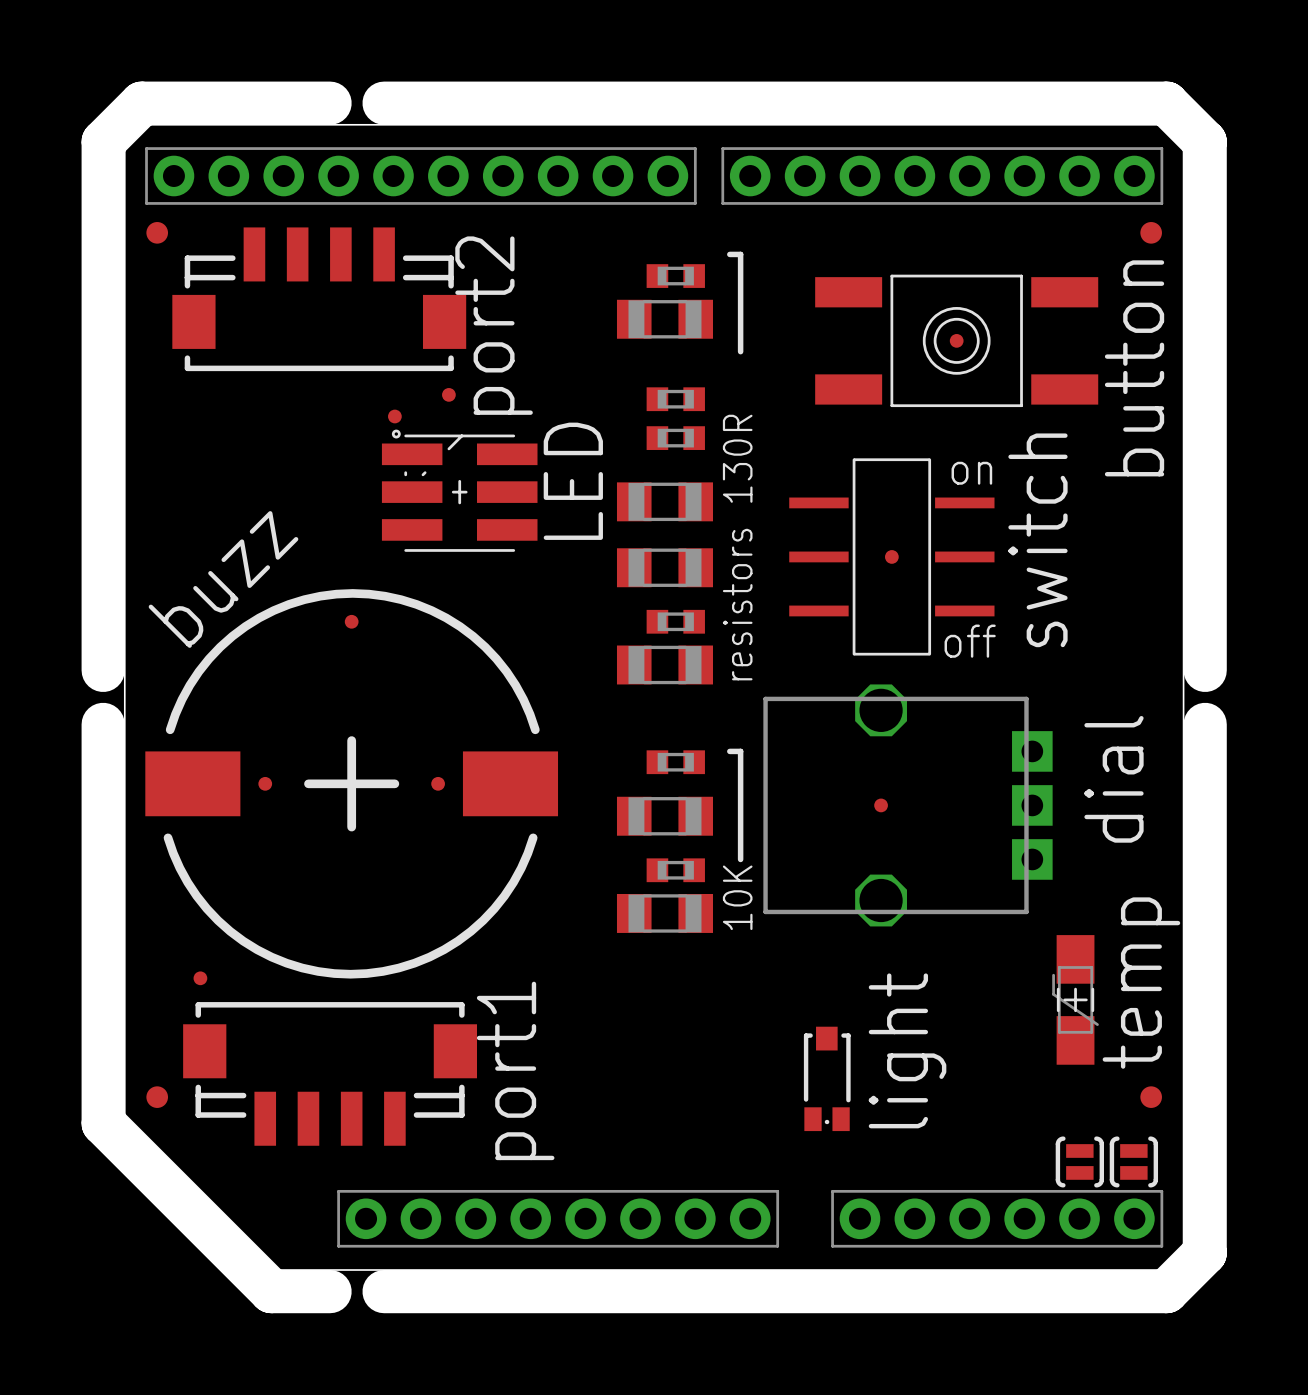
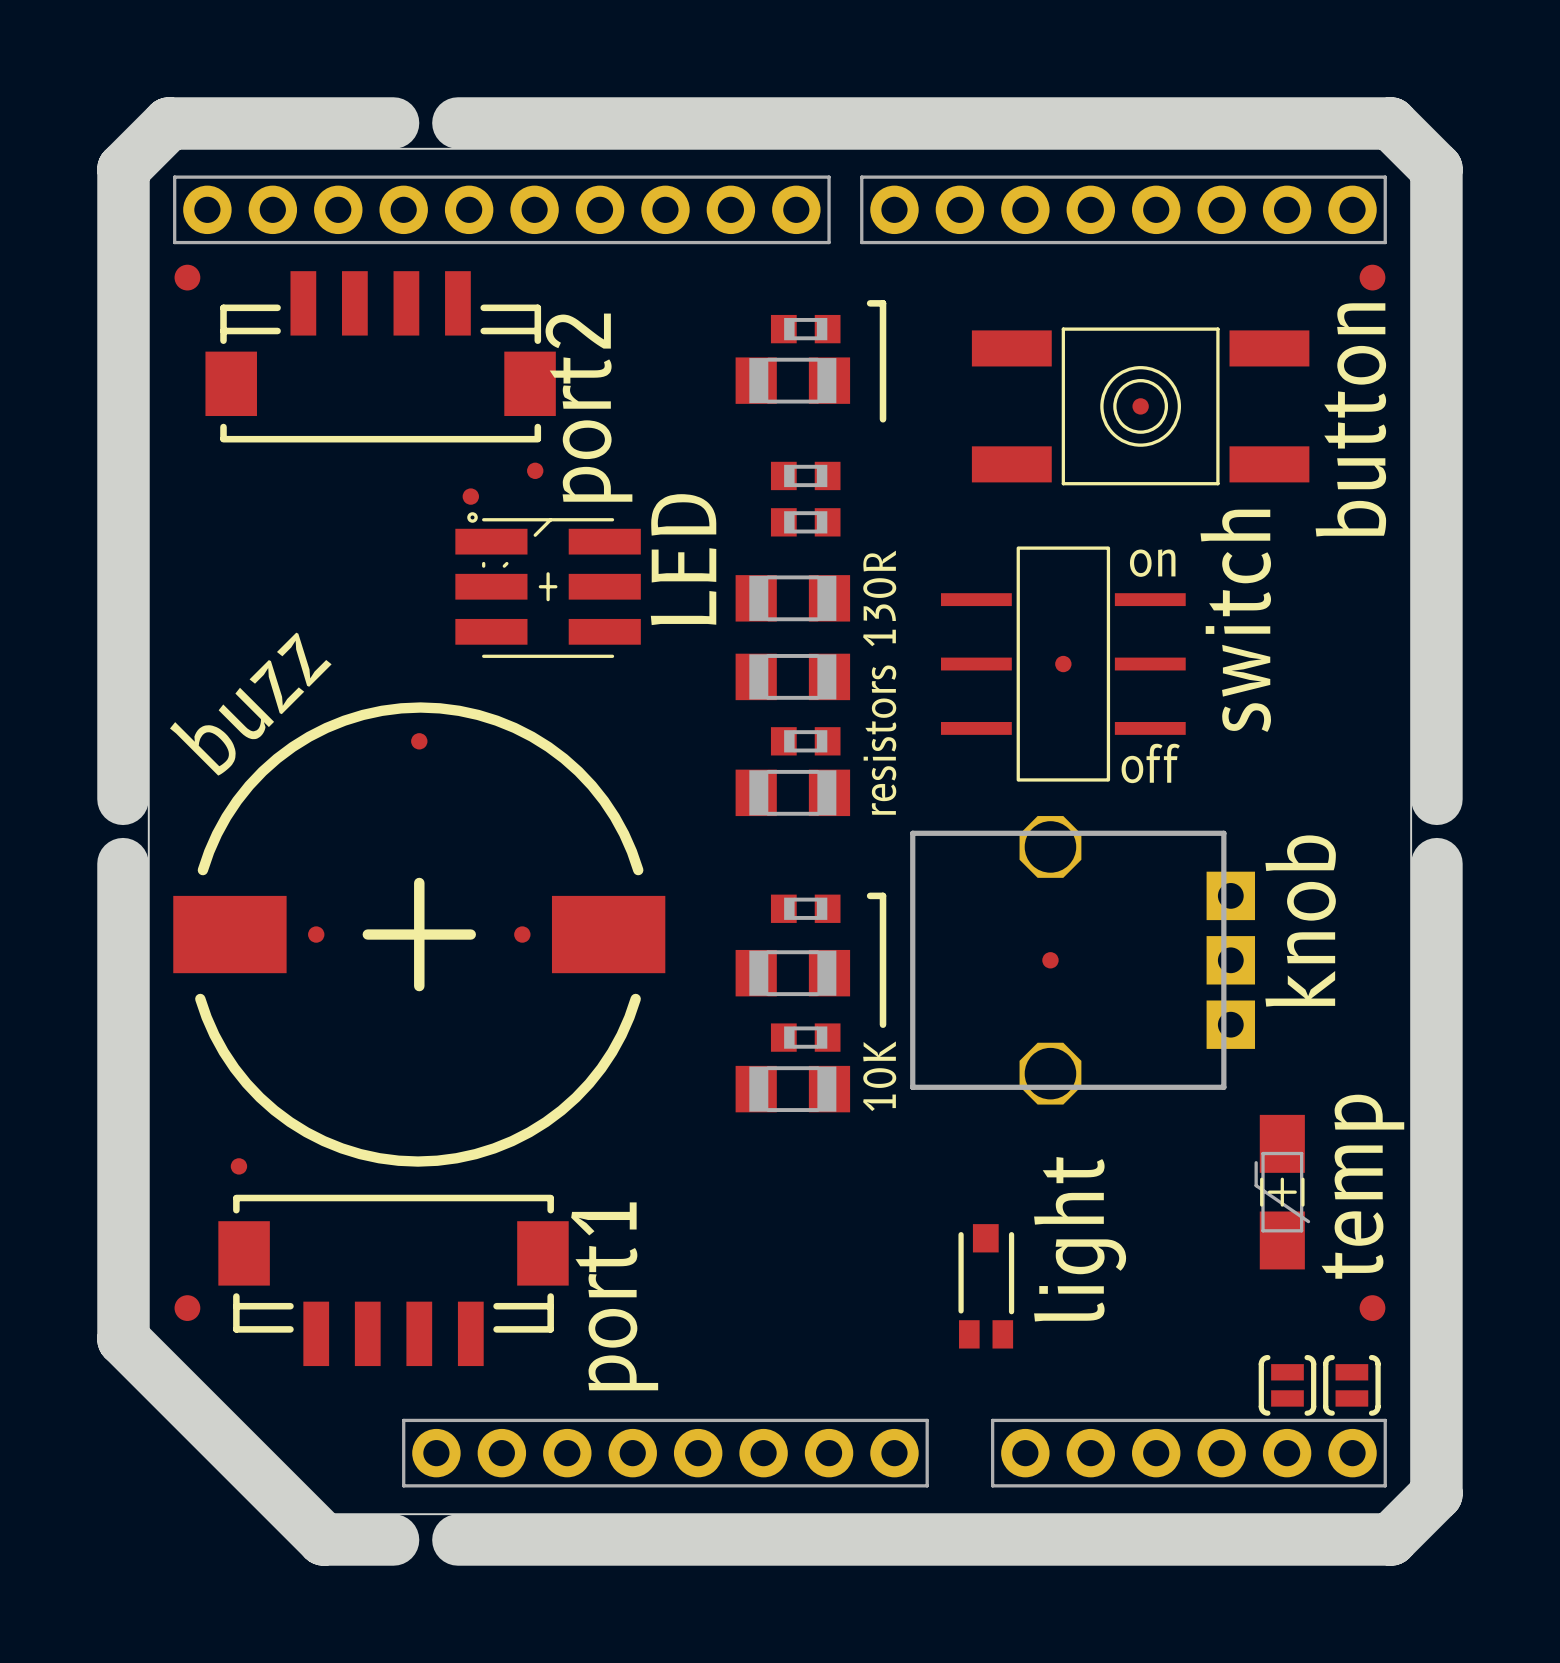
text: dial (1113, 779) -> none
text: none -> knob (1300, 921)
part footprint: [803, 1026, 851, 1132] -> [958, 1224, 1015, 1349]

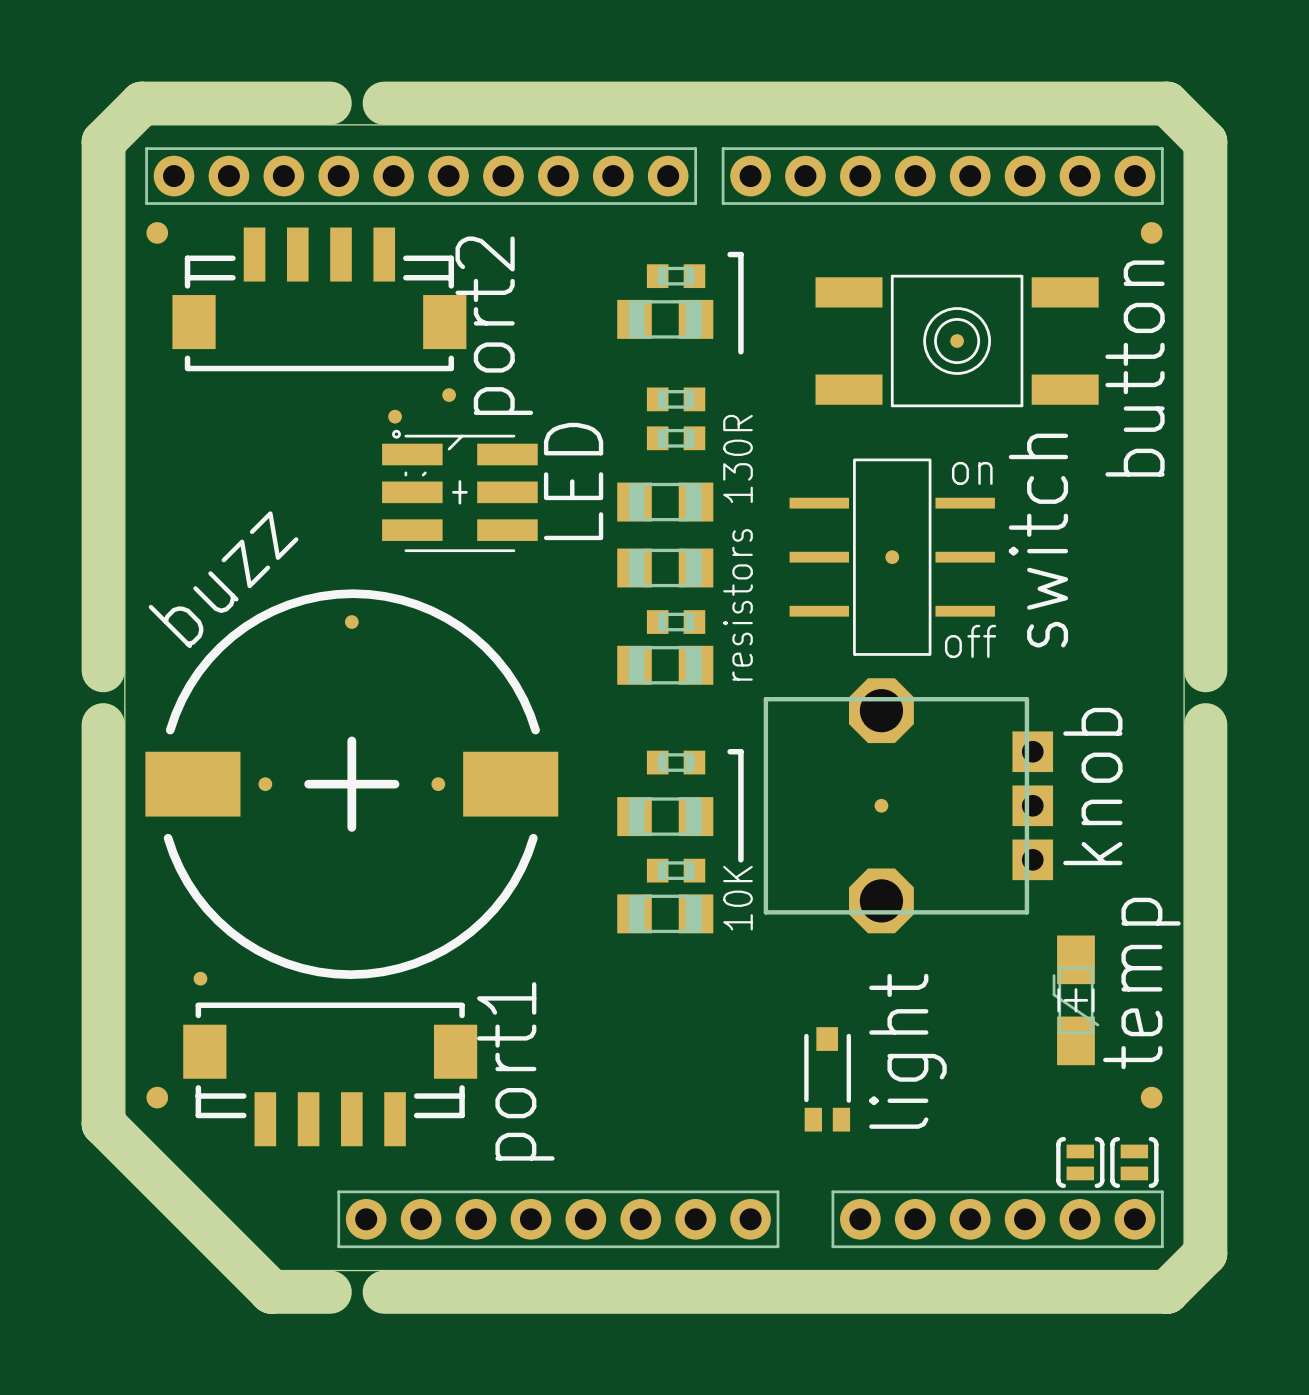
part footprint: [910, 816, 1256, 1105] -> [763, 678, 1054, 934]

